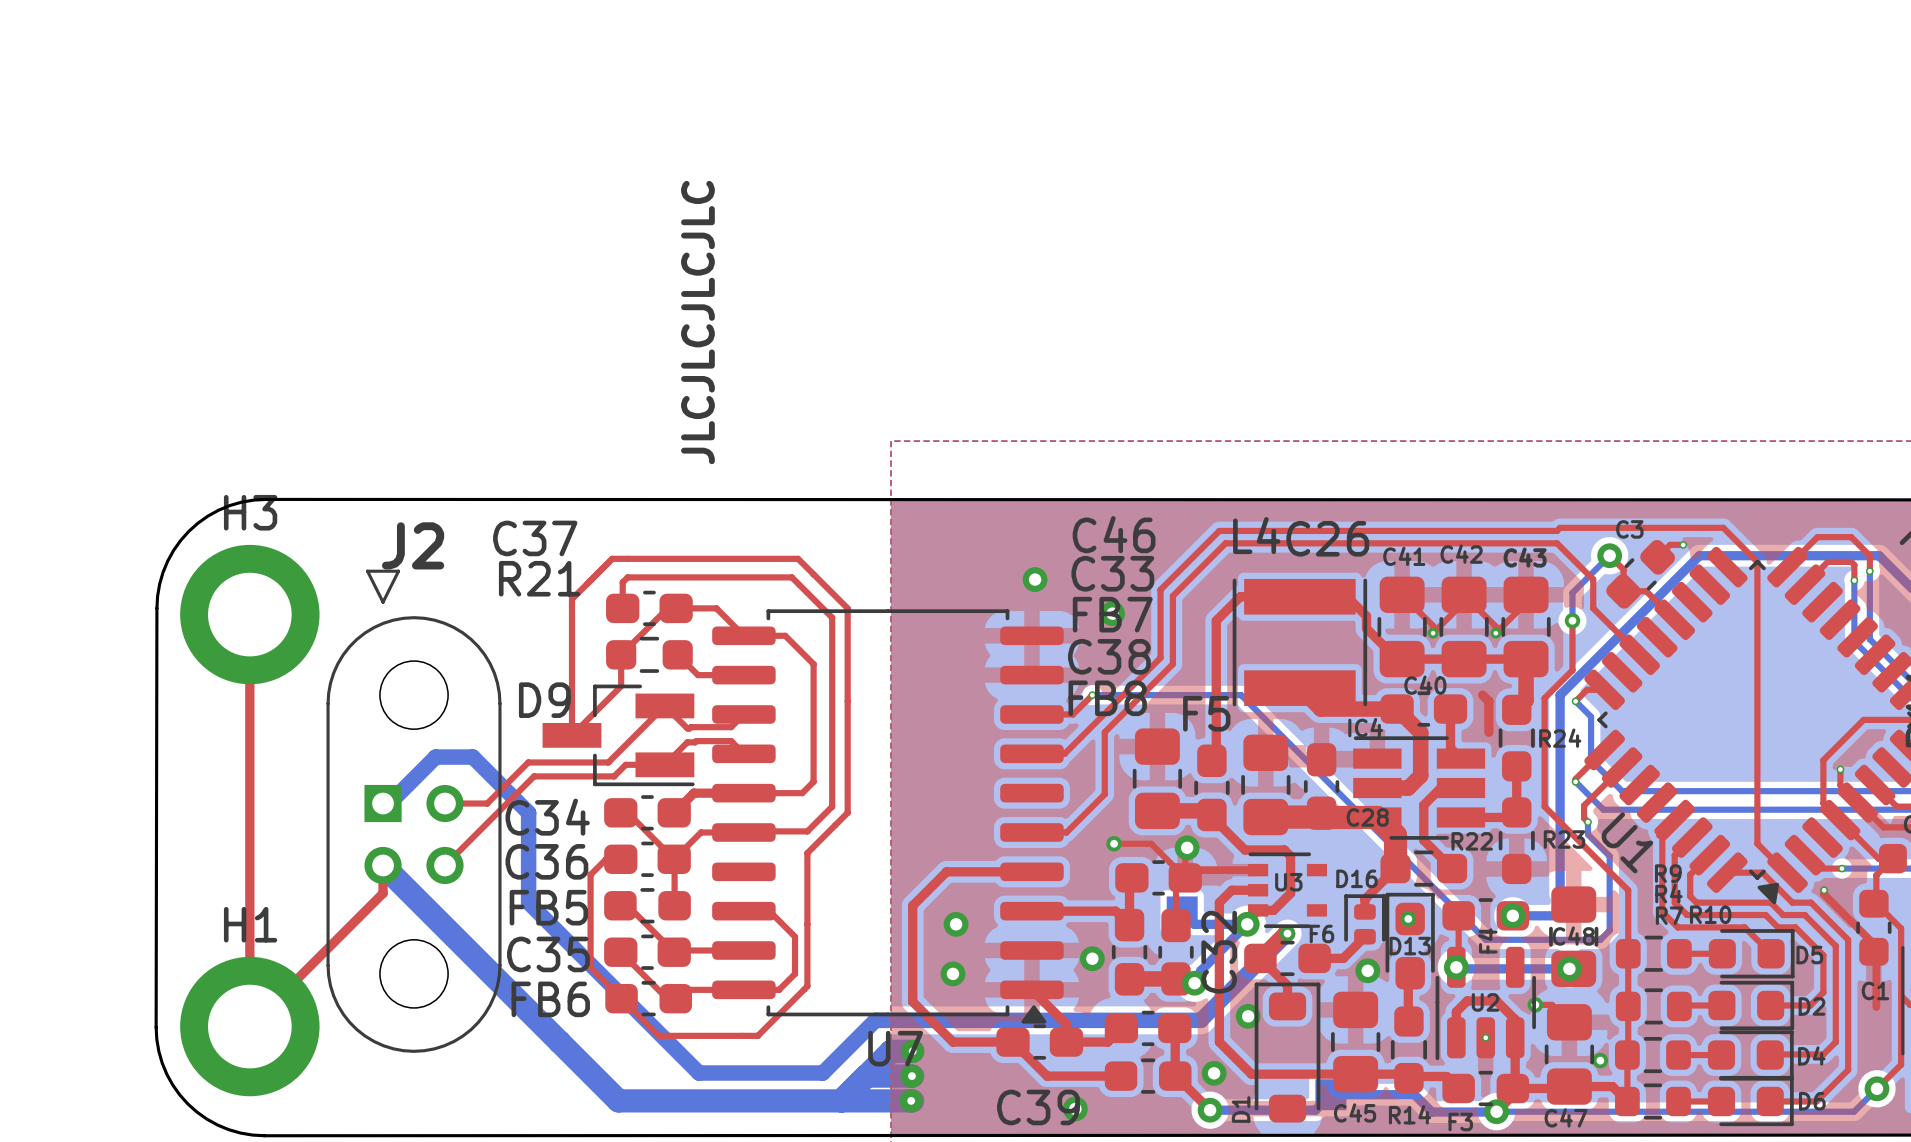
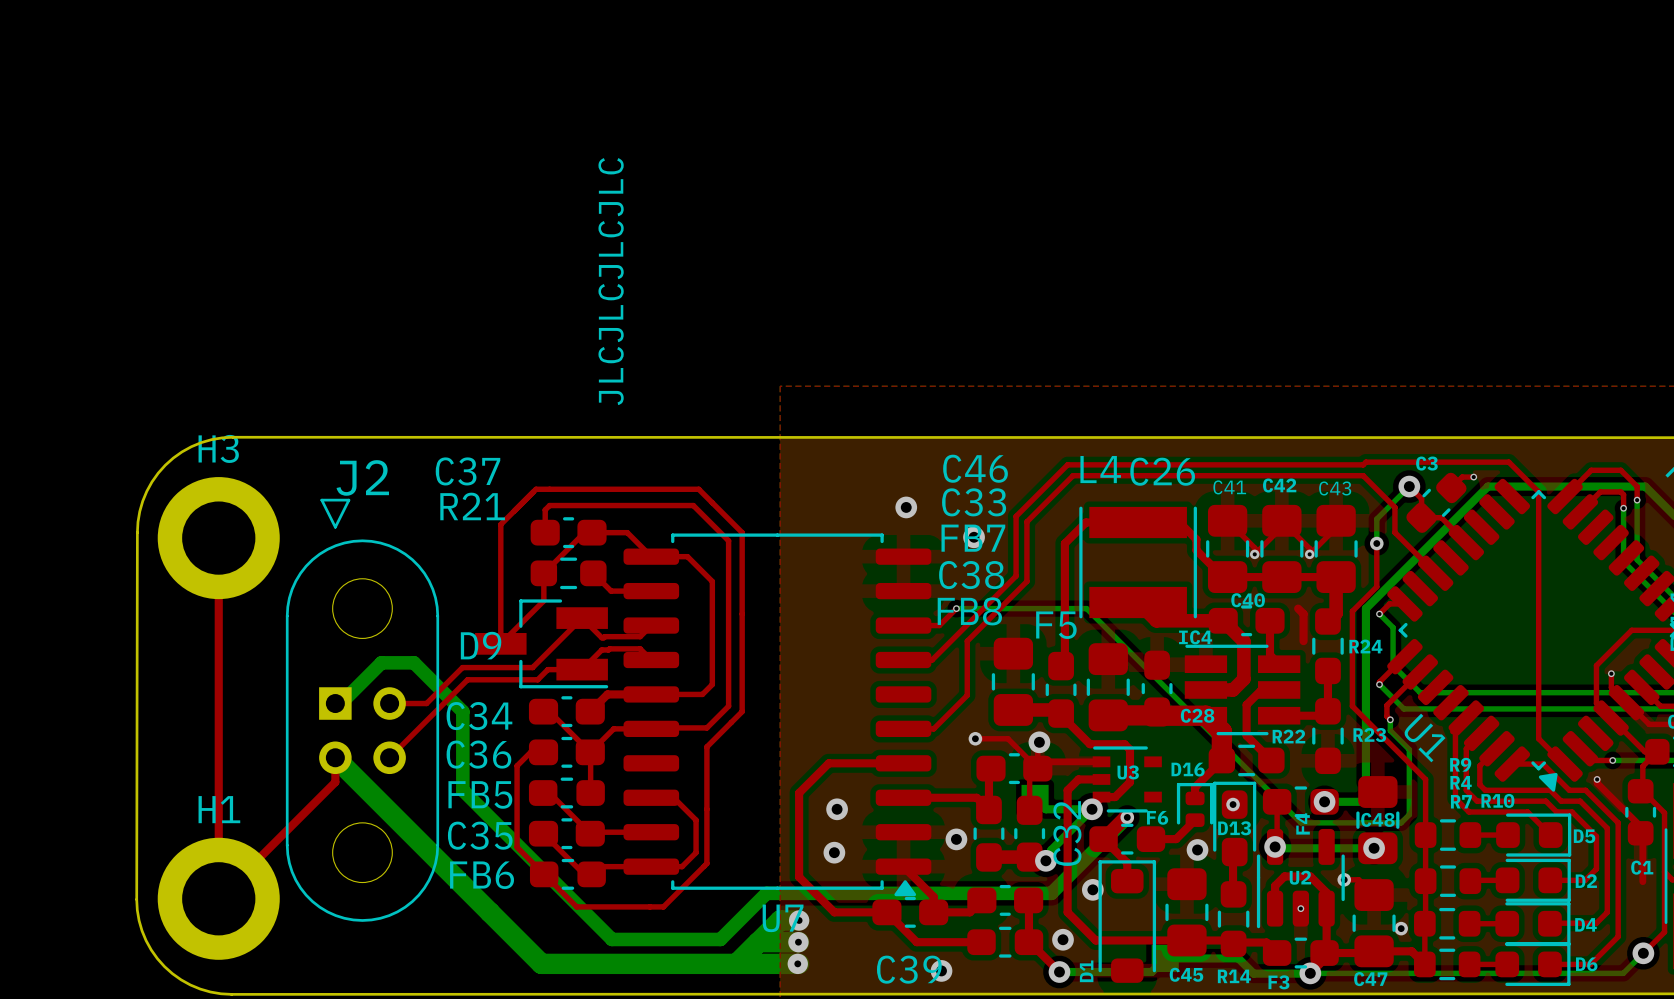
D9 name position: D9 (544, 700) -> D9 (481, 645)

